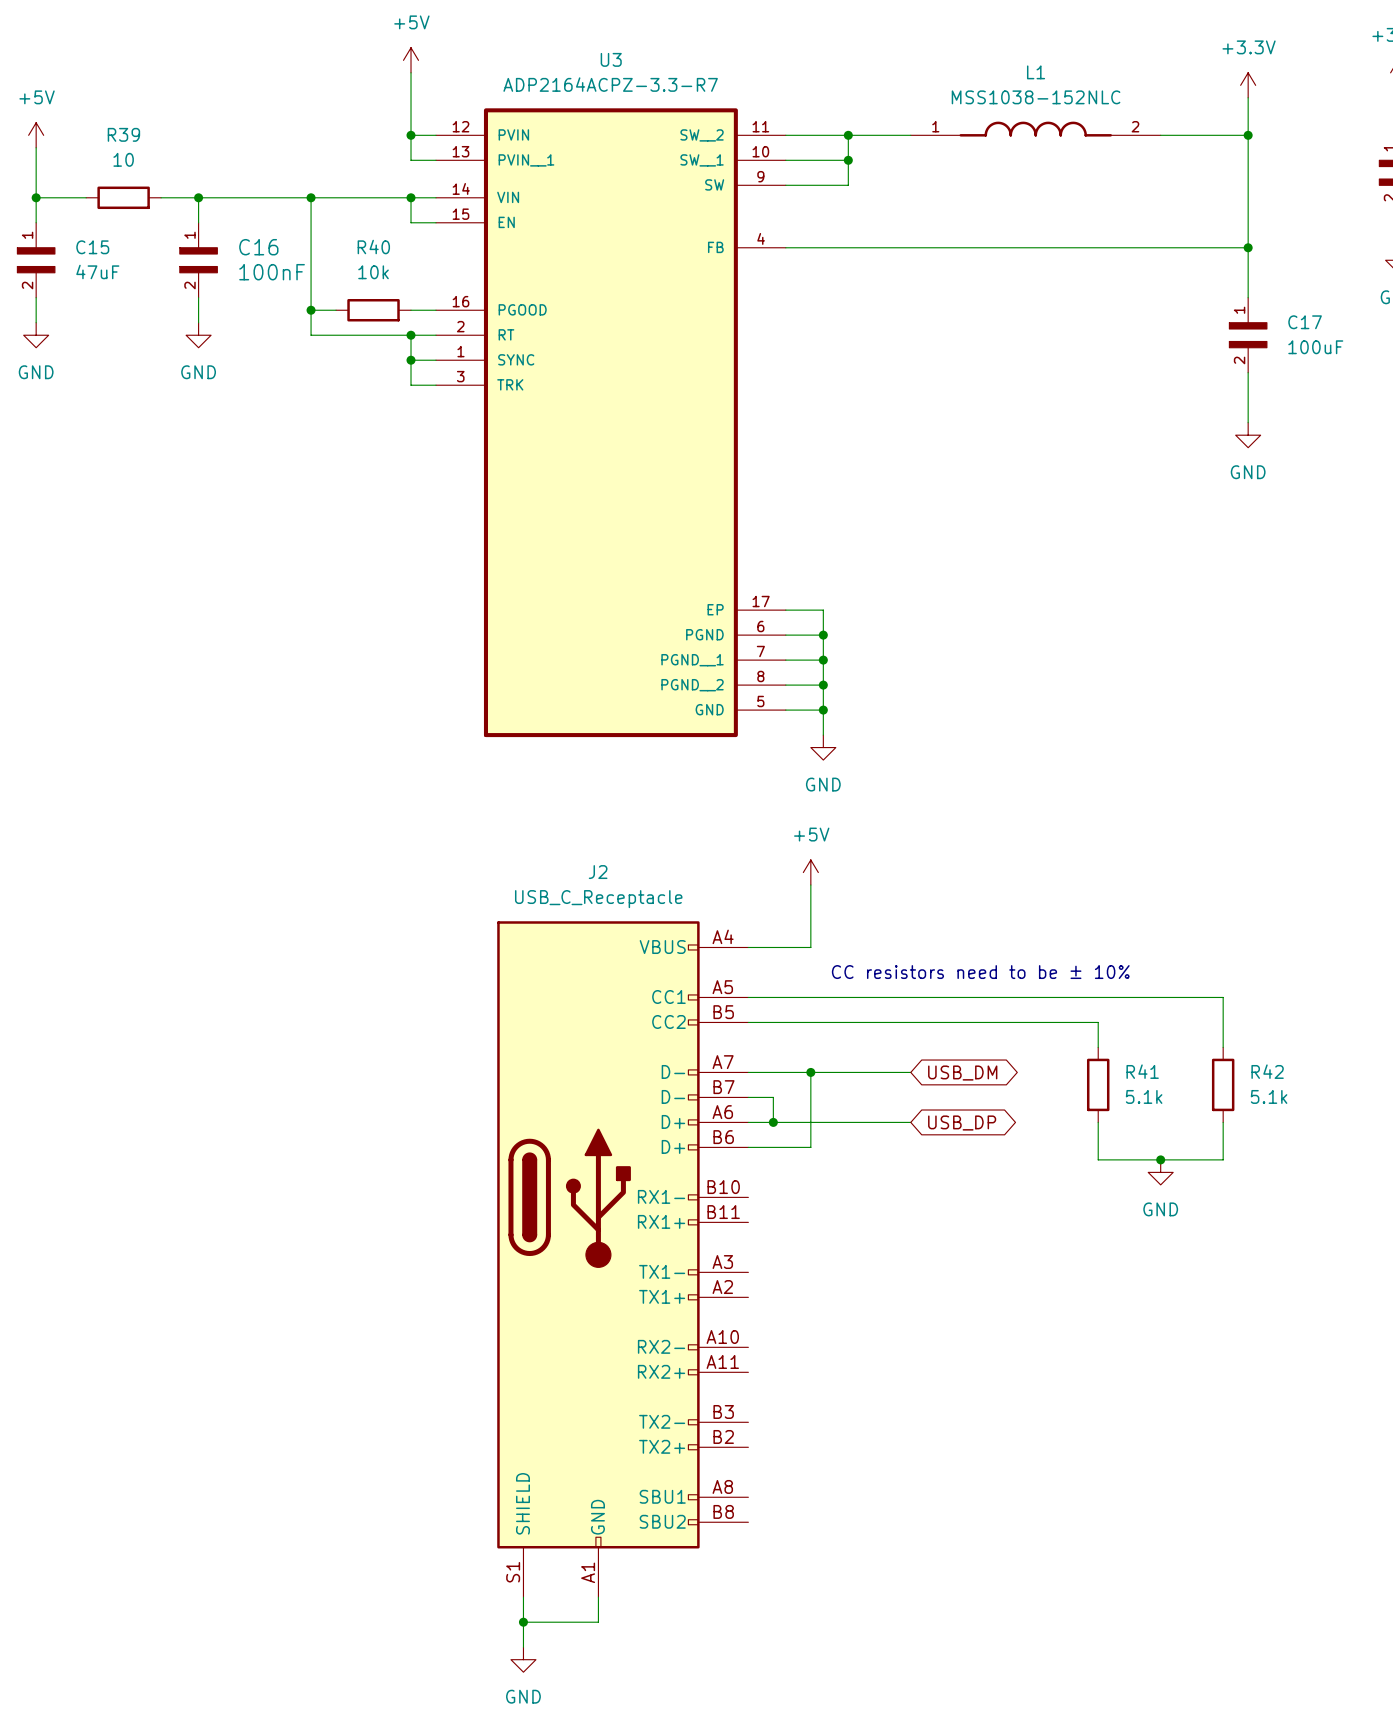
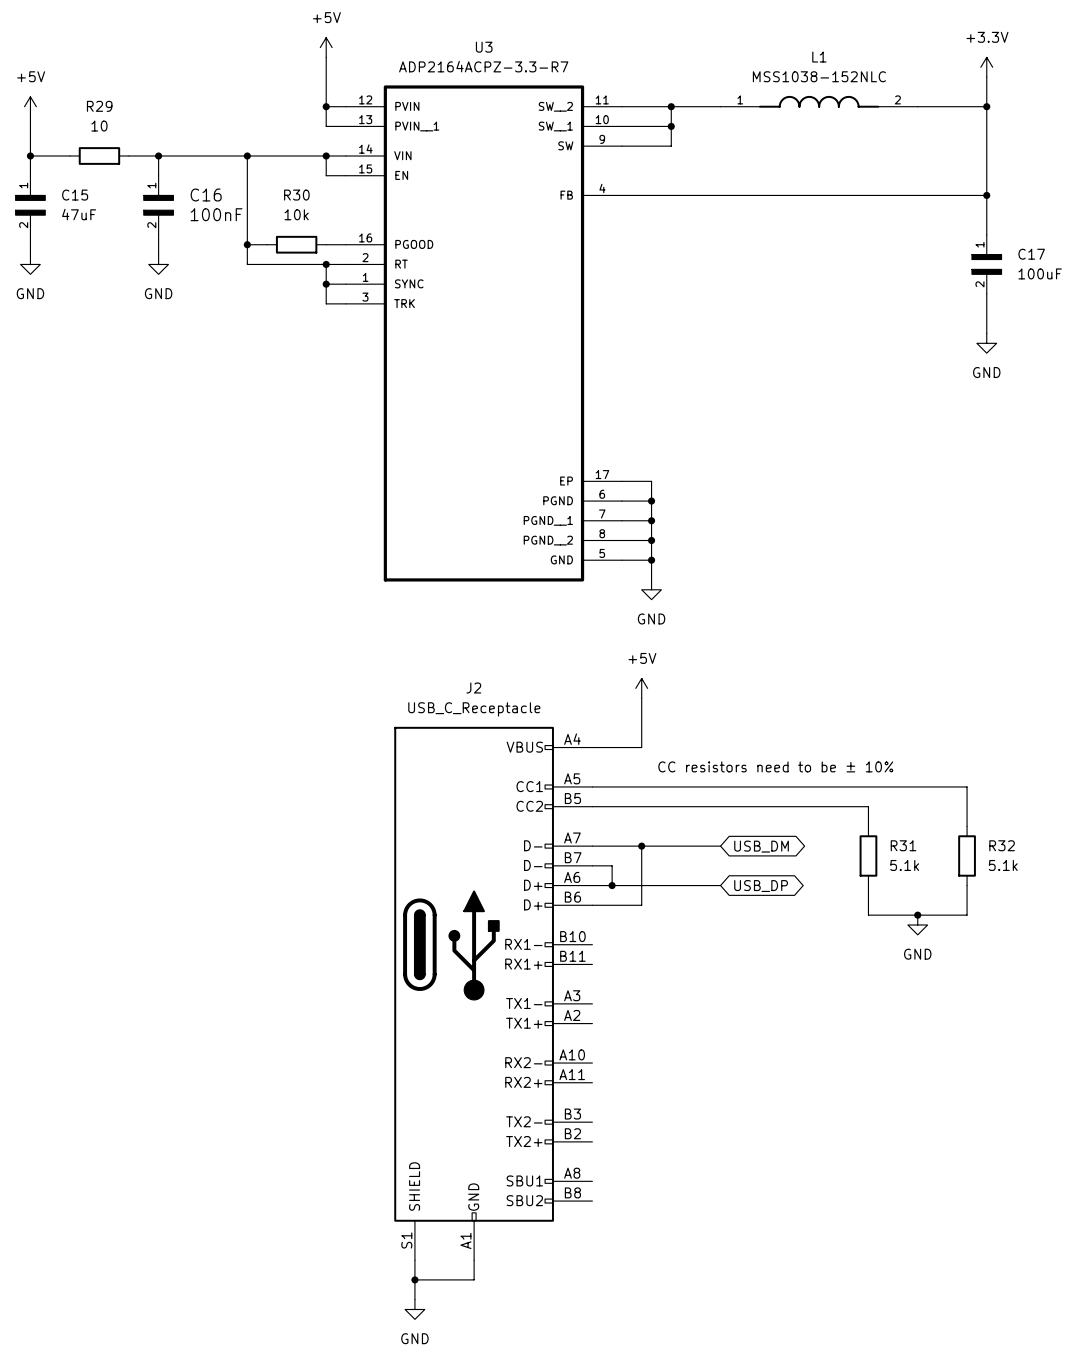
R39 name: R39 (123, 134) -> R29 (99, 106)
R40 name: R40 (373, 247) -> R30 (296, 195)
R41 name: R41 (1142, 1071) -> R31 (903, 845)
R42 name: R42 (1267, 1071) -> R32 (1002, 845)

